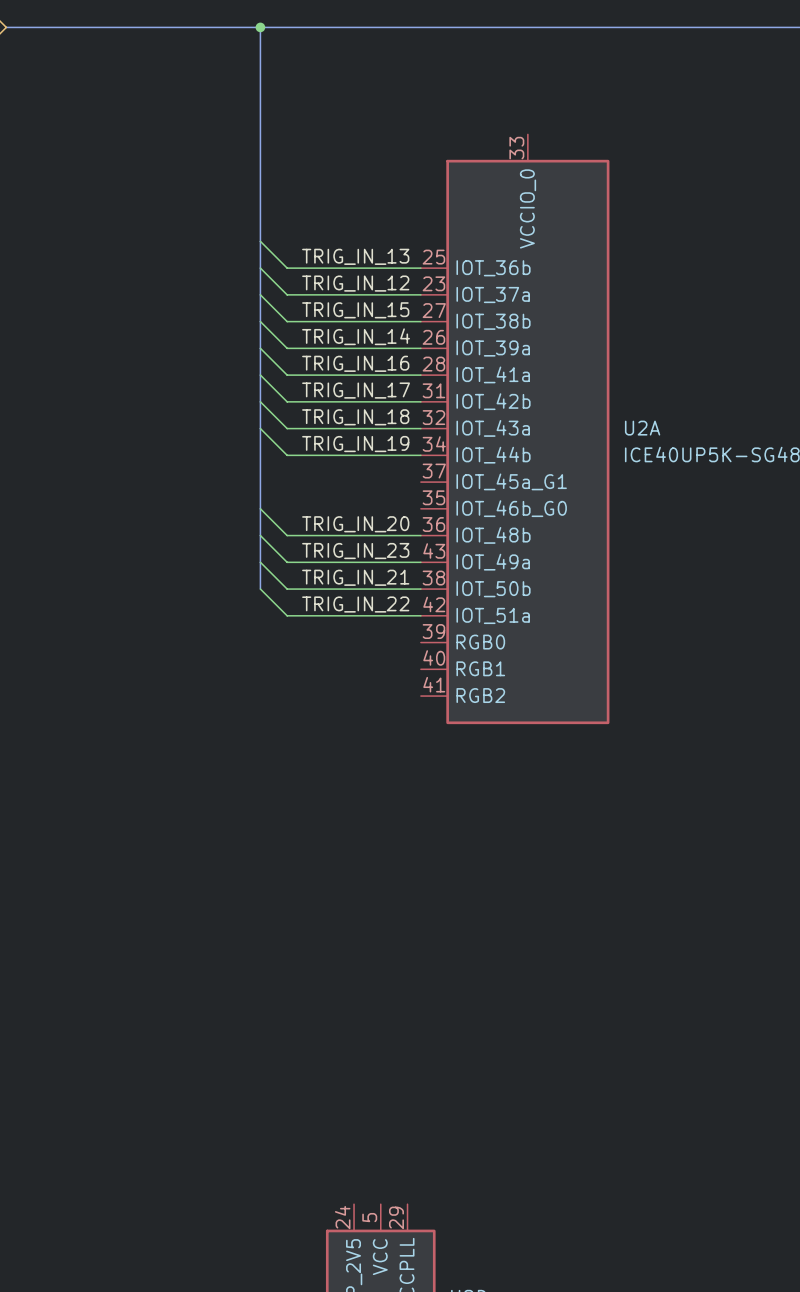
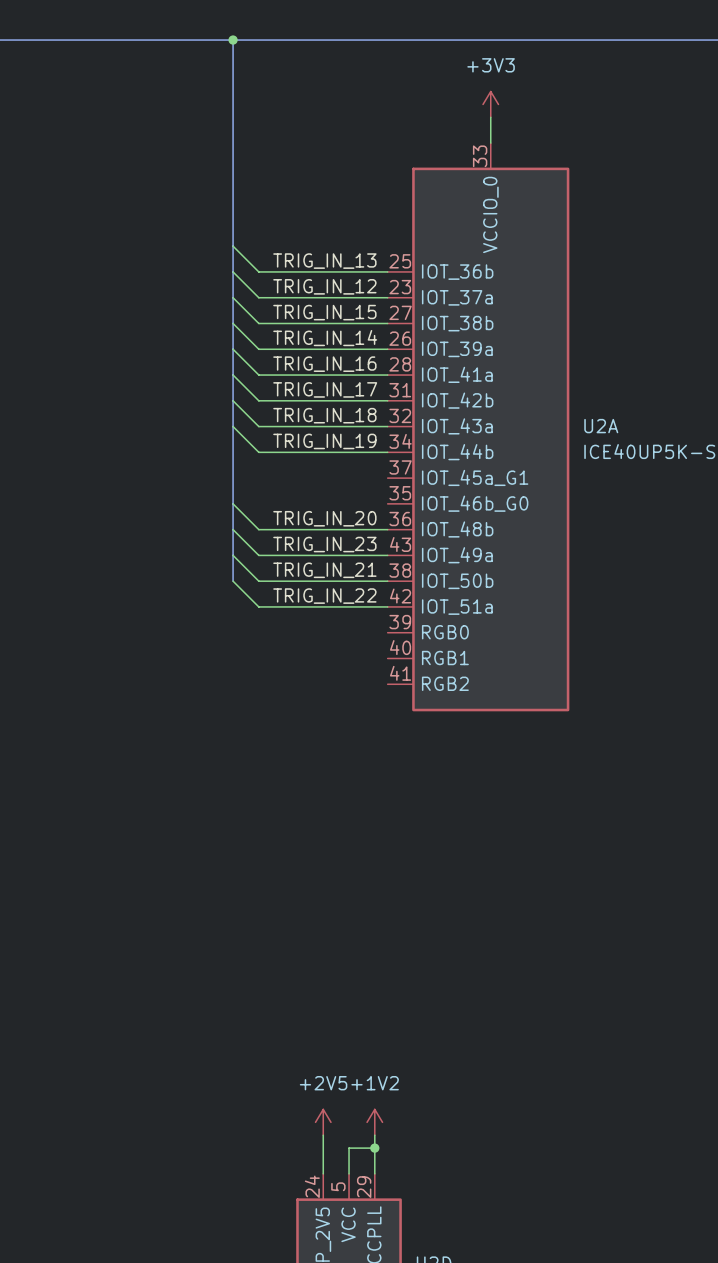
power symbol: none -> +3V3 (490, 104)
wire: none -> (490, 117) (490, 143)
power symbol: none -> +2V5 (323, 1122)
power symbol: none -> +1V2 (374, 1122)
wire: none -> (323, 1135) (323, 1173)
wire: none -> (374, 1135) (374, 1173)
wire: none -> (374, 1148) (349, 1148) (349, 1173)
junction: none -> (374, 1148)

